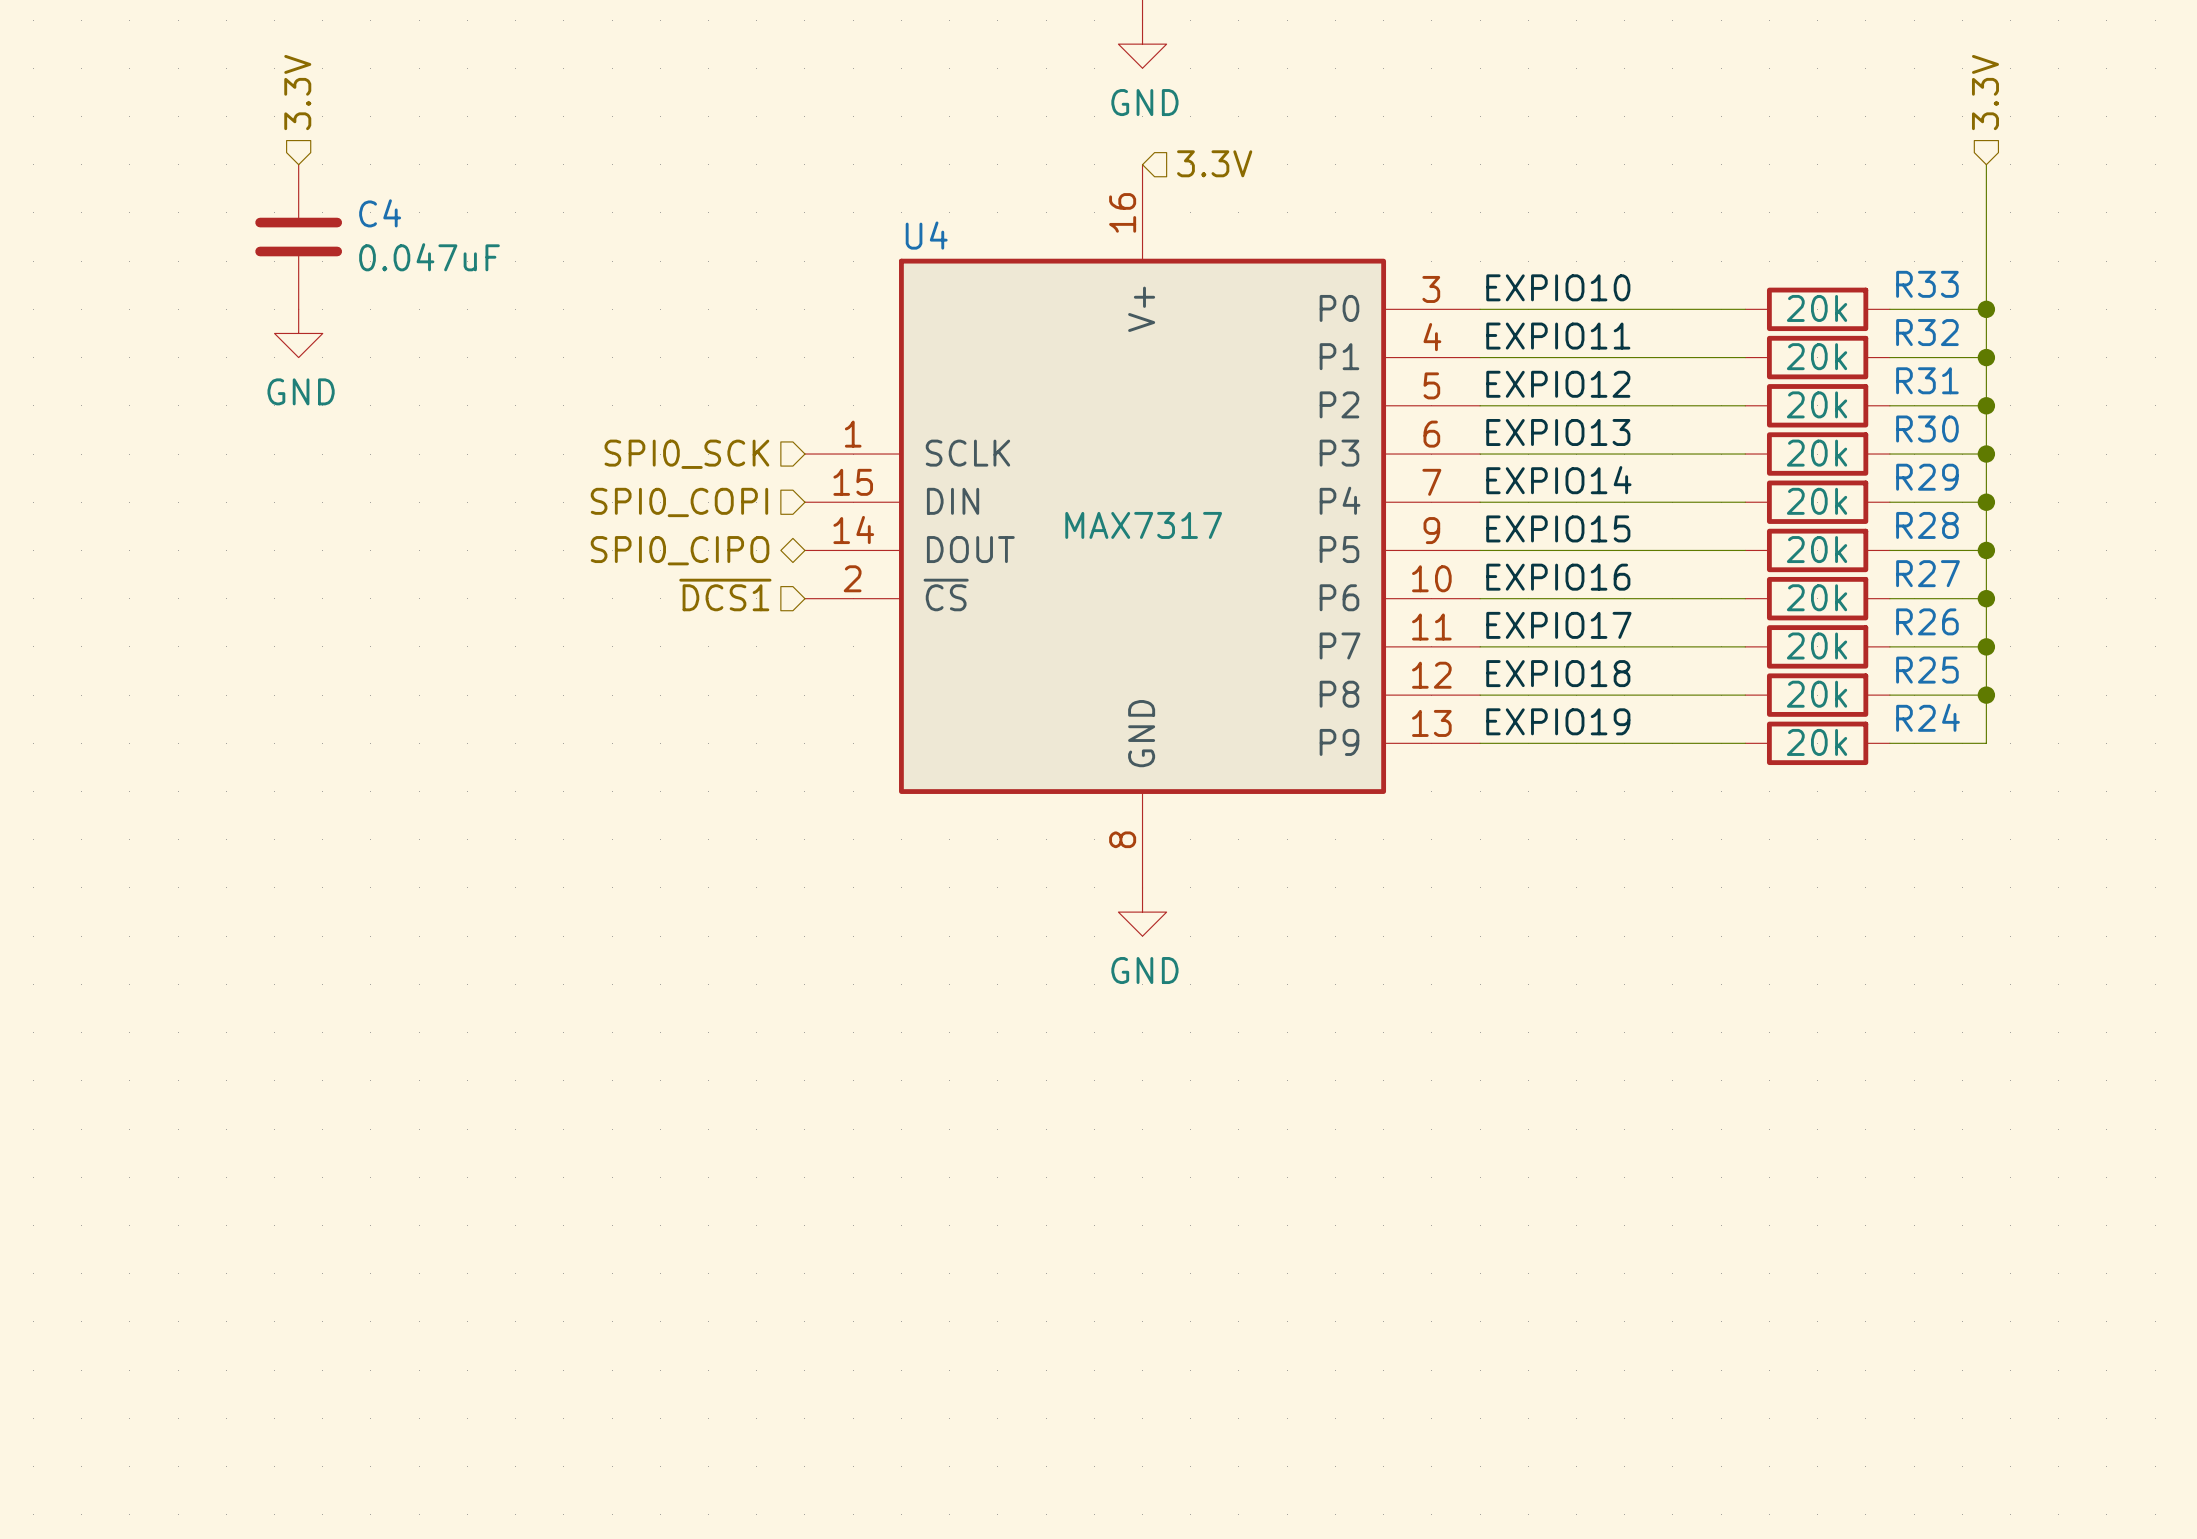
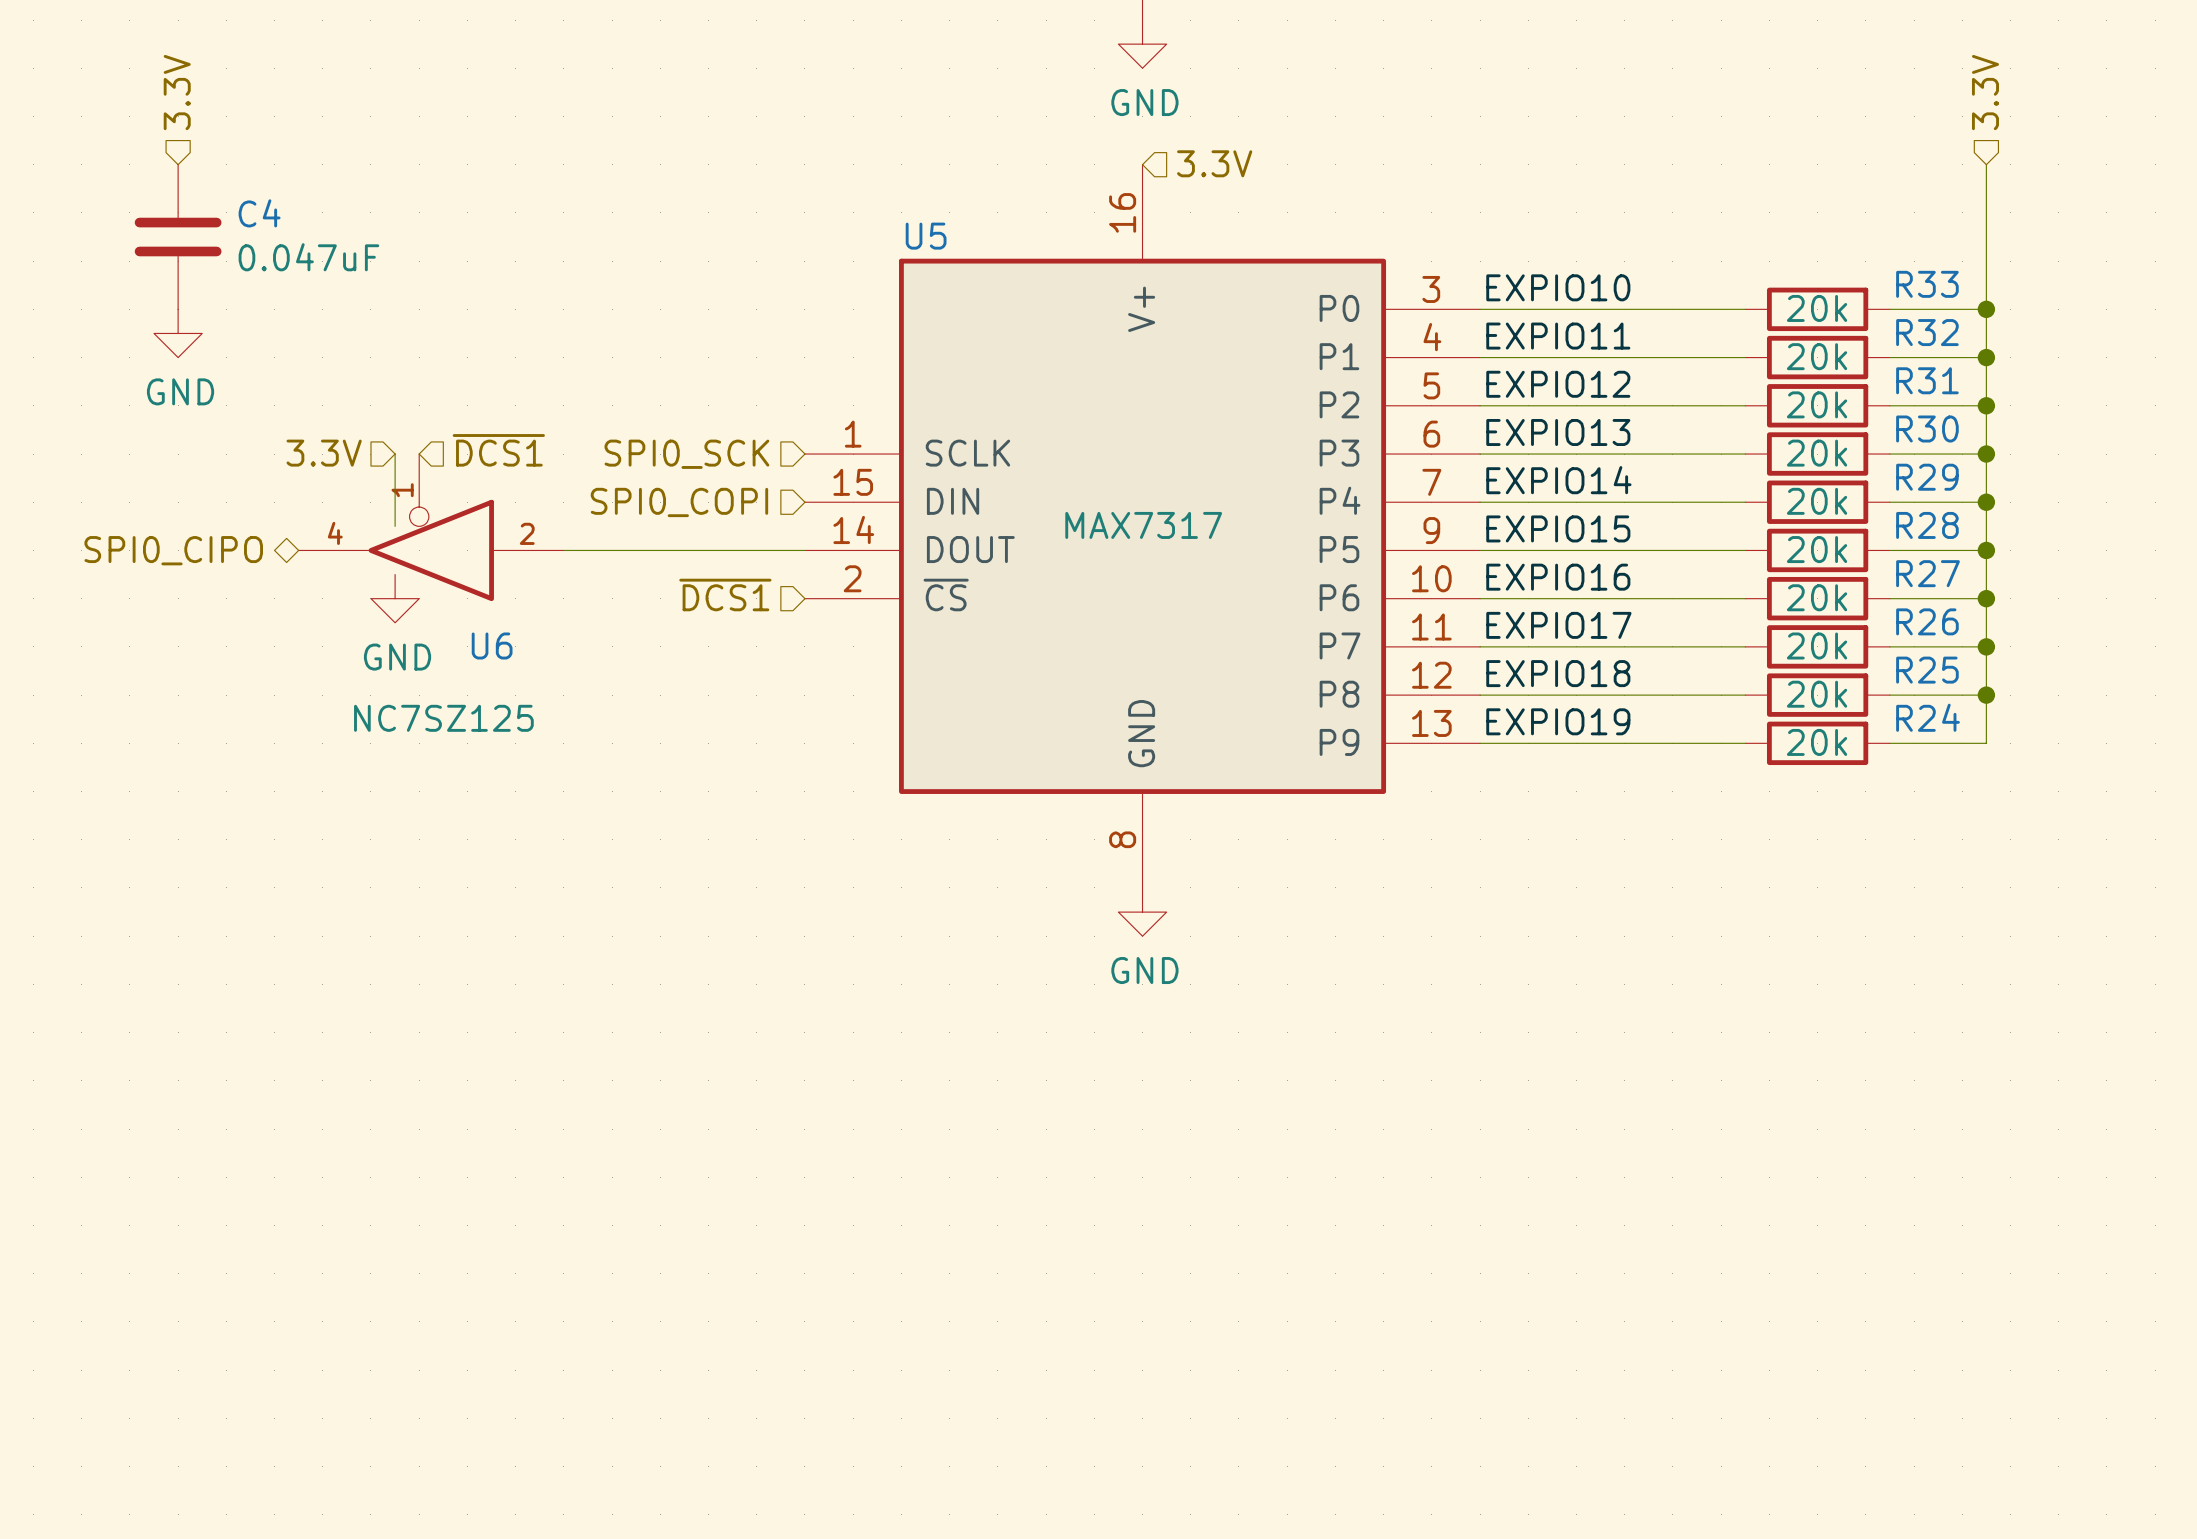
hierarchical label position: 3.3V (297, 92) -> 3.3V (177, 92)
U4 name: U4 (926, 235) -> U5 (926, 236)
C4 position: (298, 237) -> (178, 237)
power symbol position: GND (298, 333) -> GND (178, 333)
hierarchical label: none -> ~{DCS1} (498, 450)
hierarchical label: none -> 3.3V (324, 453)
wire: none -> (395, 454) (395, 526)
U6: none -> NC7SZ125 (431, 527)
hierarchical label: none -> SPI0_CIPO (173, 550)
wire: none -> (563, 550) (804, 550)
hierarchical label: SPI0_CIPO (680, 550) -> none
power symbol: none -> GND (395, 598)

